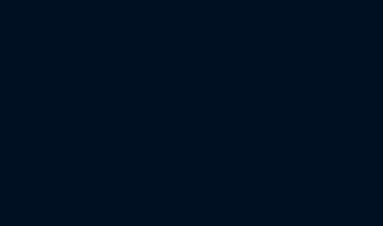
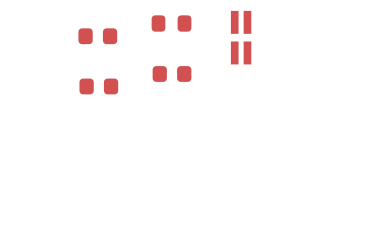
part: none -> (171, 23)
part: none -> (97, 36)
part: none -> (241, 37)
part: none -> (172, 73)
part: none -> (98, 86)

